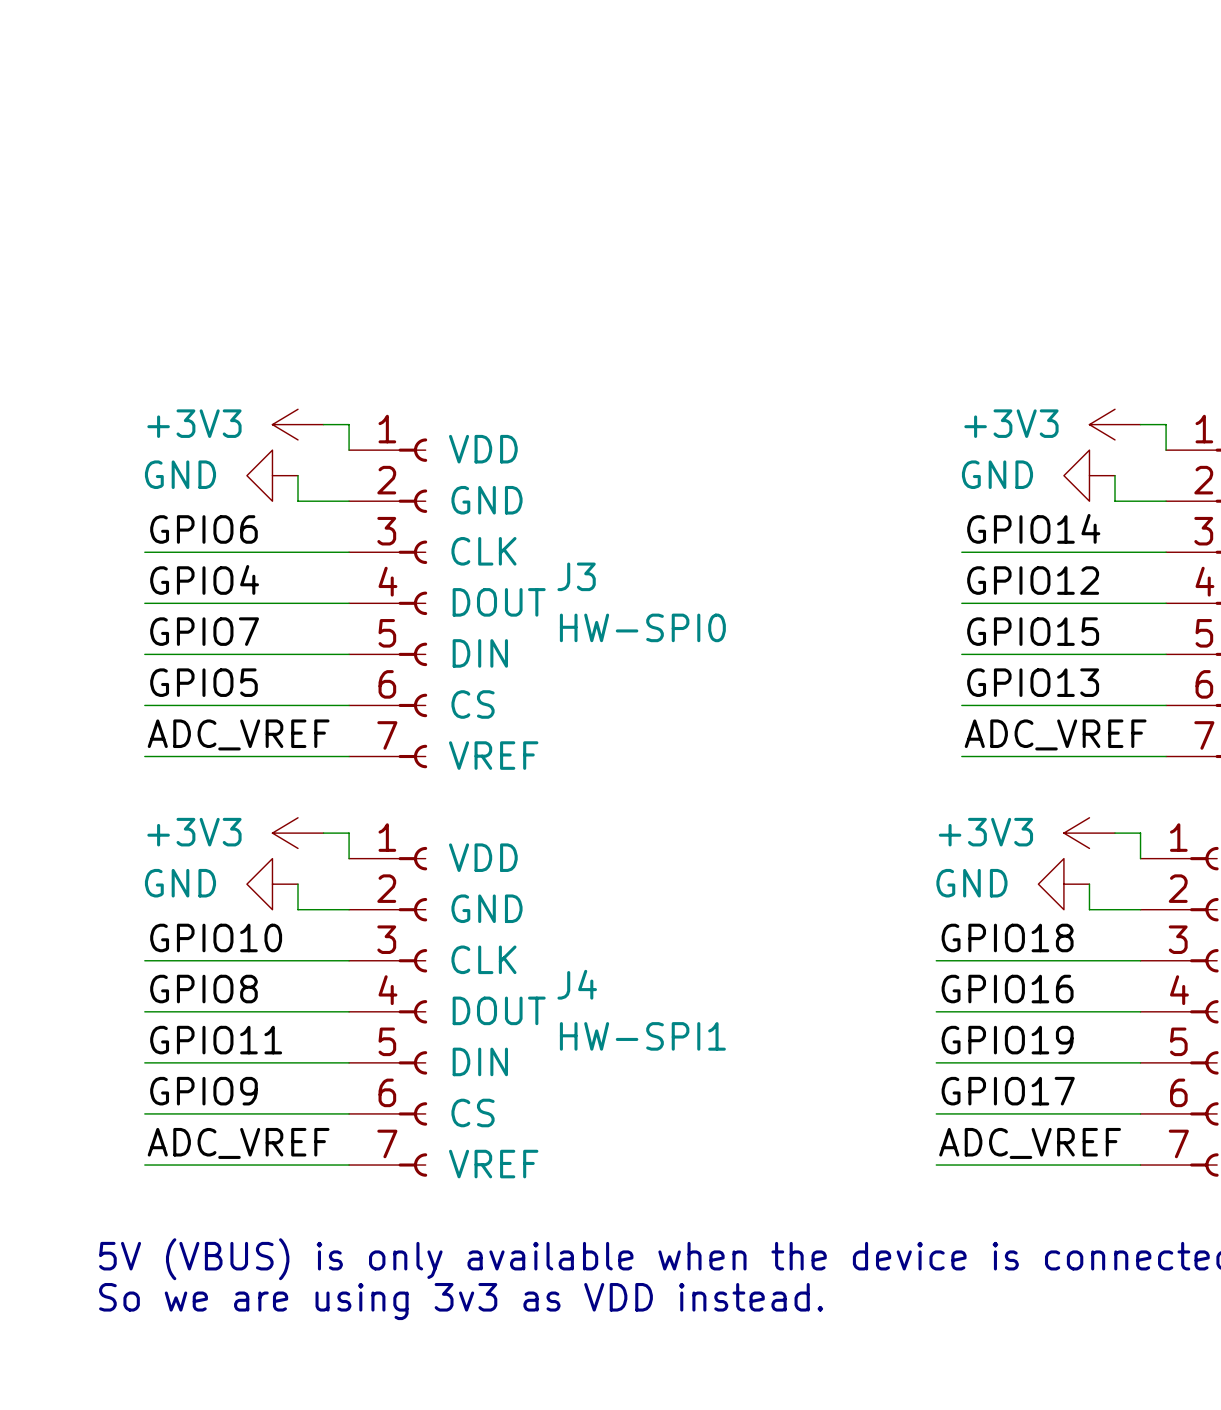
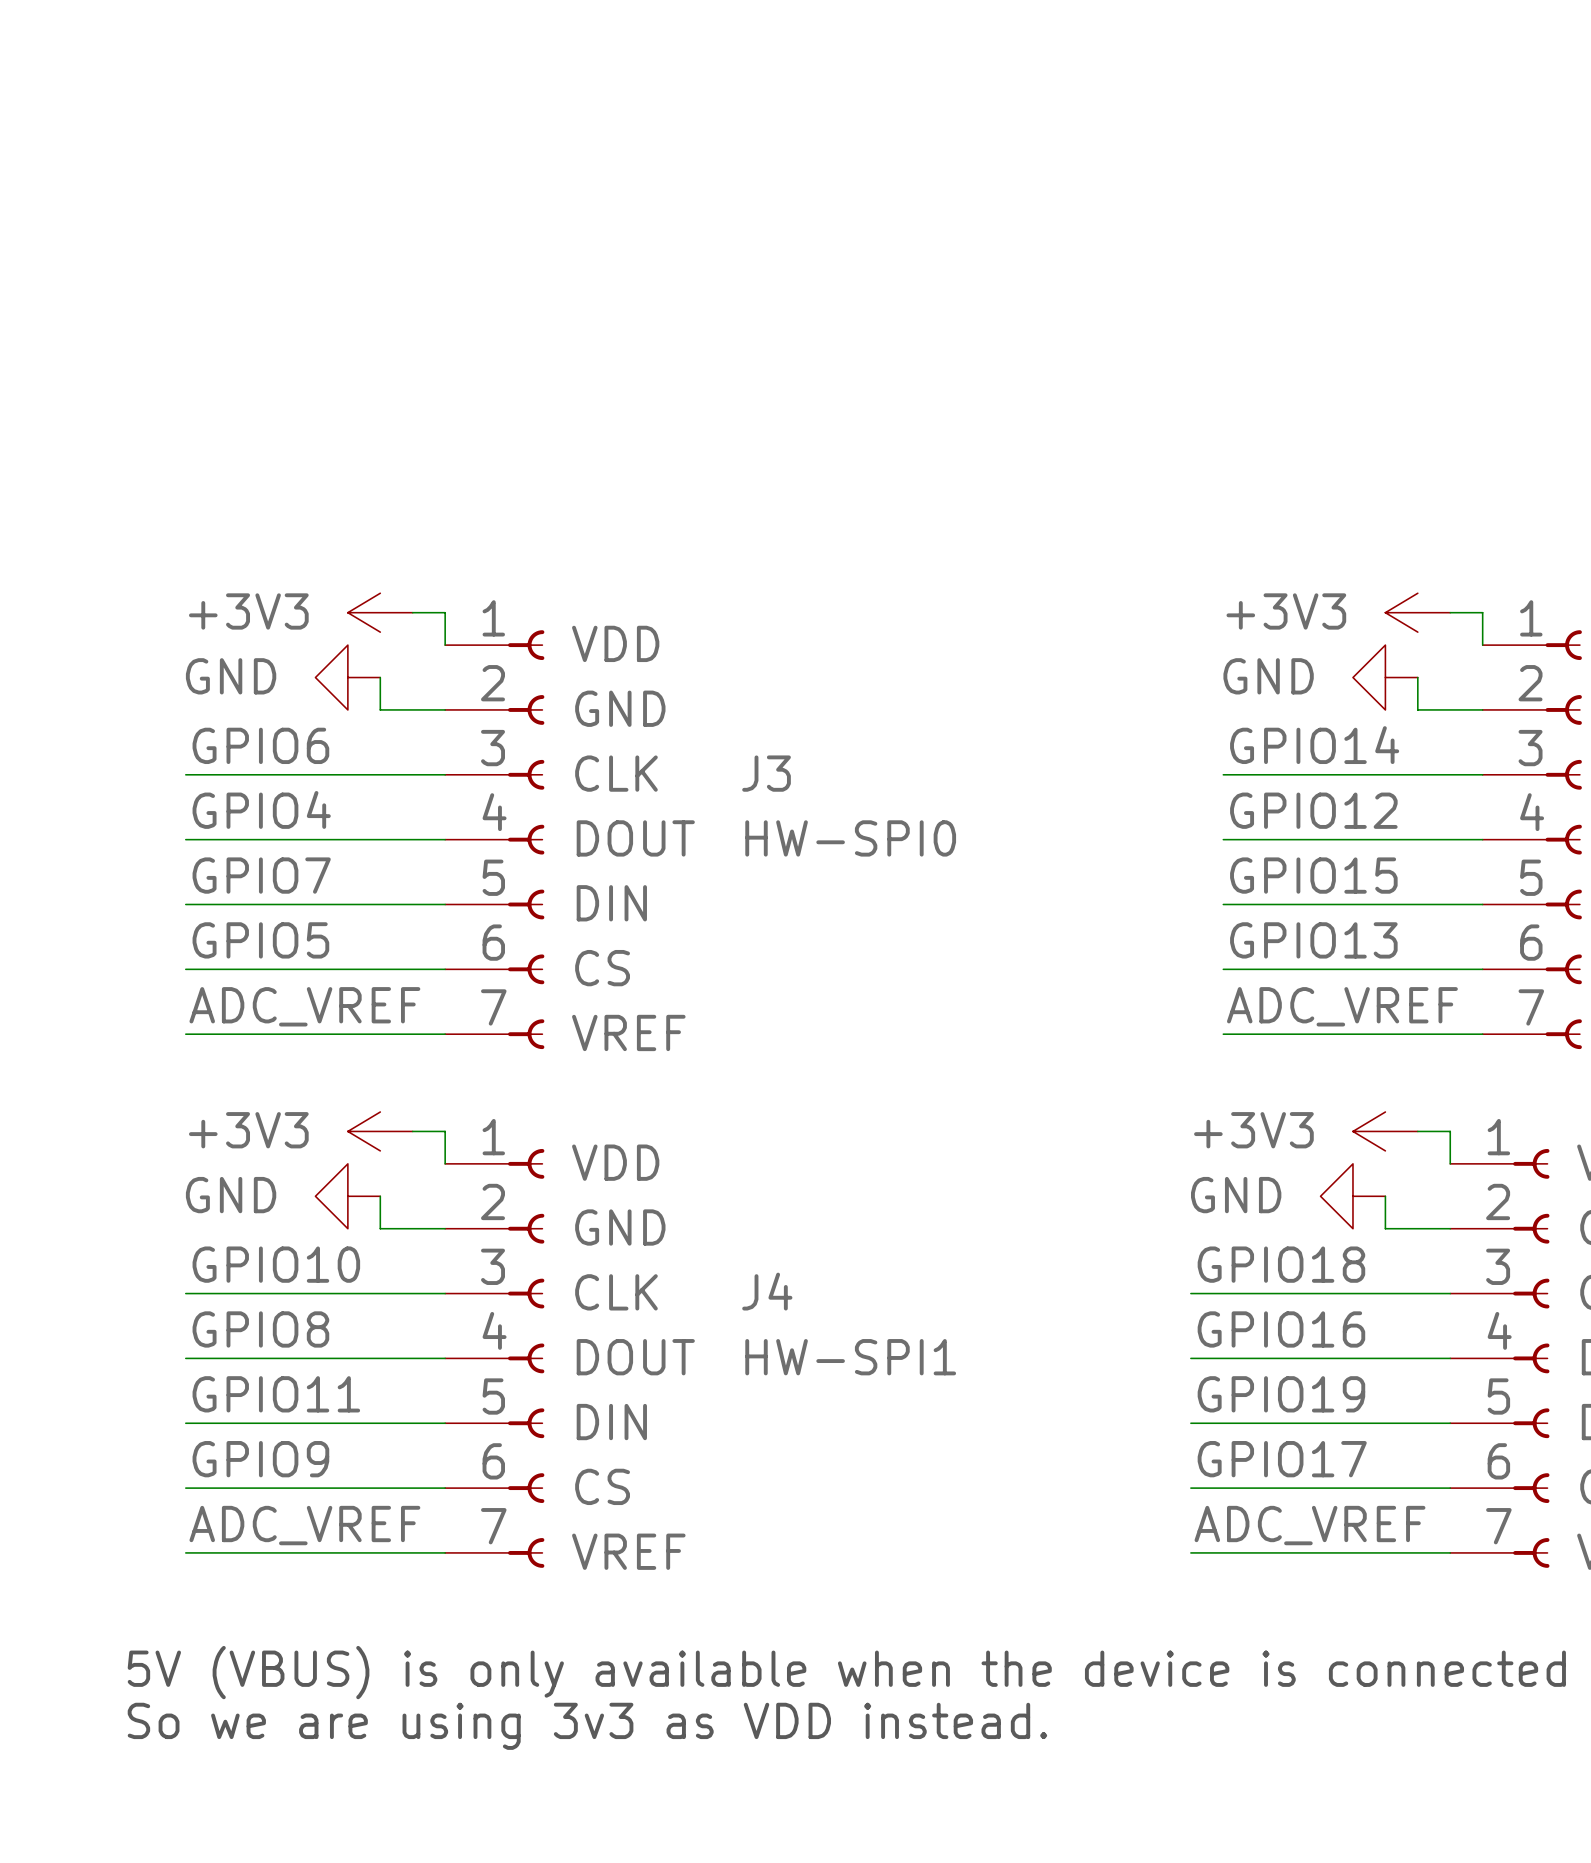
J3 name position: J3 (576, 576) -> J3 (766, 773)
J3 value position: HW-SPI0 (642, 627) -> HW-SPI0 (850, 838)
J4 name position: J4 (577, 984) -> J4 (767, 1291)
J4 value position: HW-SPI1 (642, 1036) -> HW-SPI1 (850, 1357)

